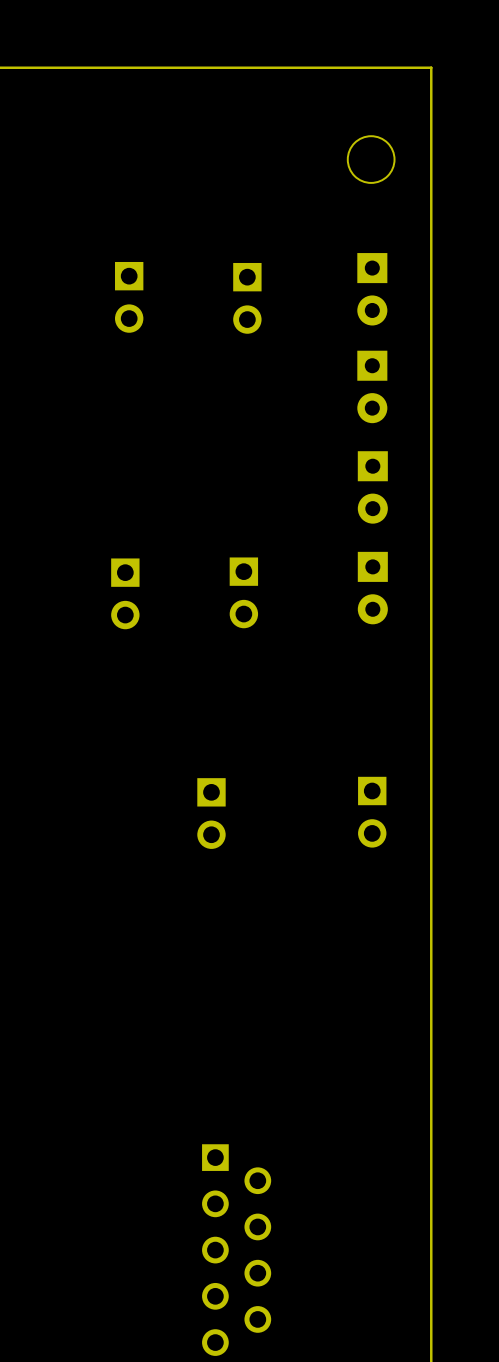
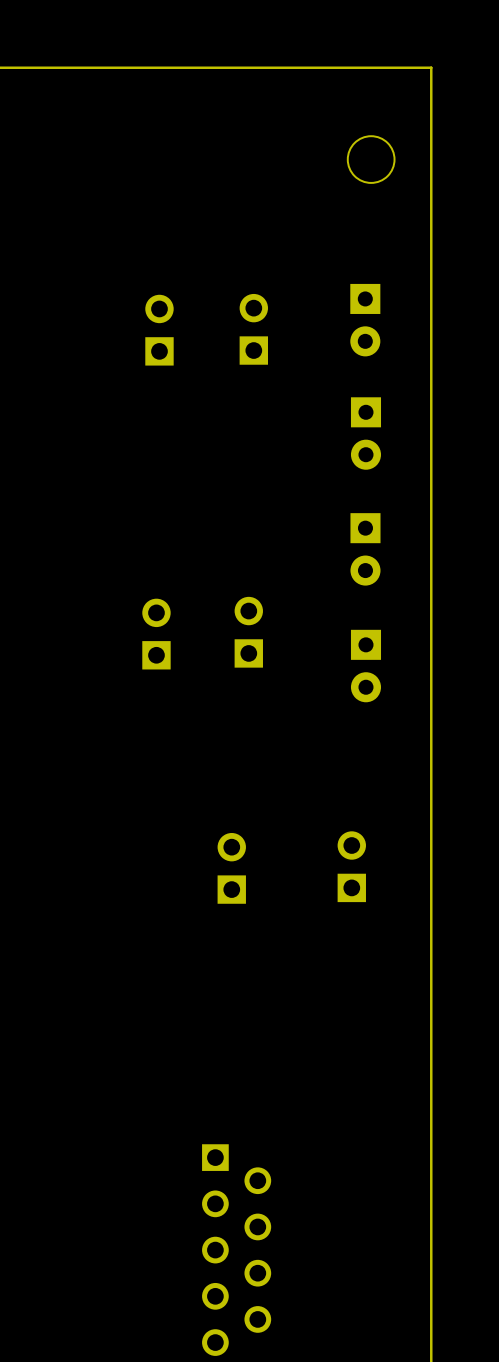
part position: (372, 289) -> (365, 320)
part rotation: 0° (129, 297) -> 180° (159, 330)
part position: (129, 297) -> (159, 330)
part rotation: 0° (247, 298) -> 180° (253, 329)
part: (372, 386) -> none
part: none -> (365, 433)
part: (372, 487) -> none
part: none -> (365, 549)
part: (372, 588) -> none
part rotation: 0° (243, 592) -> 180° (248, 632)
part: (125, 593) -> none
part: none -> (156, 634)
part: none -> (365, 666)
part rotation: 0° (372, 812) -> 180° (351, 866)
part position: (372, 812) -> (351, 866)
part rotation: 0° (211, 813) -> 180° (231, 868)
part position: (211, 813) -> (231, 868)

